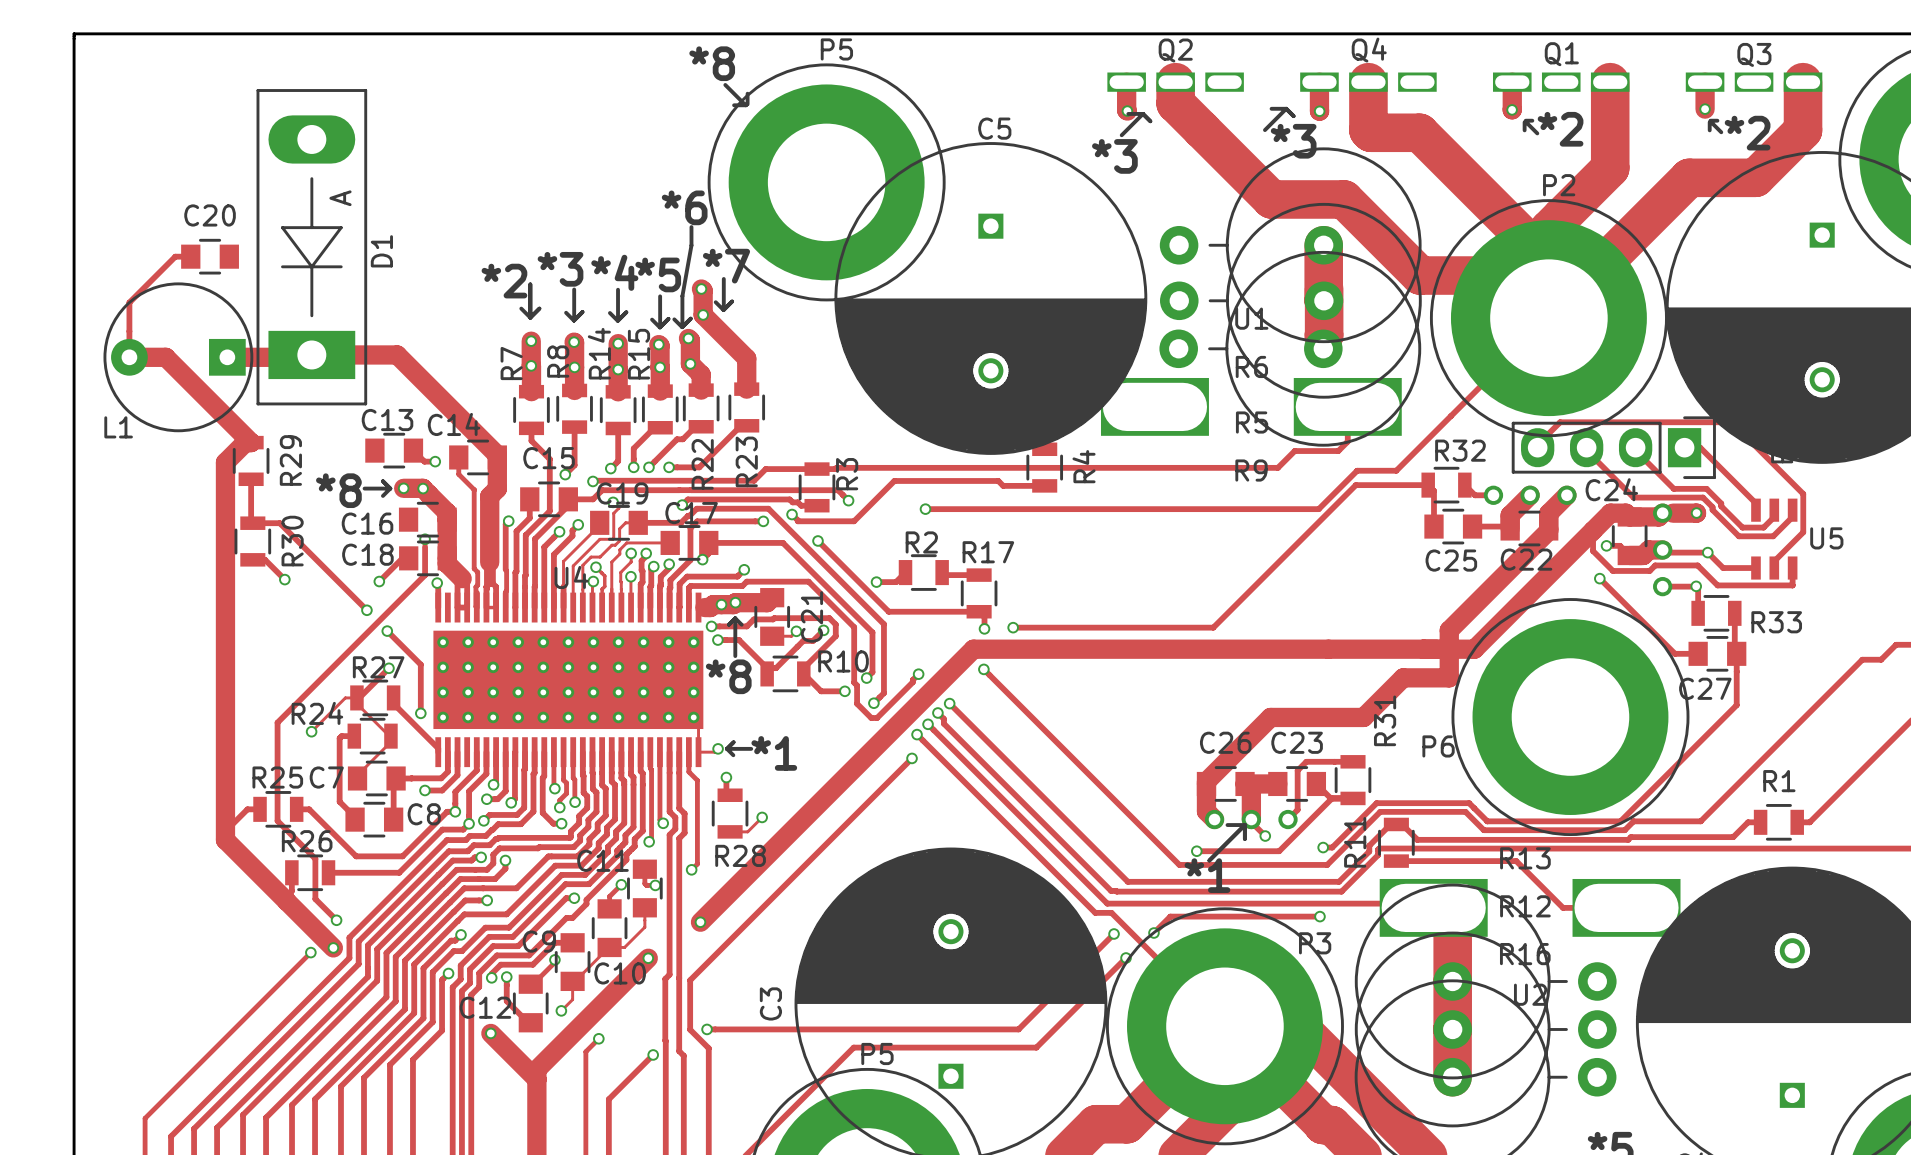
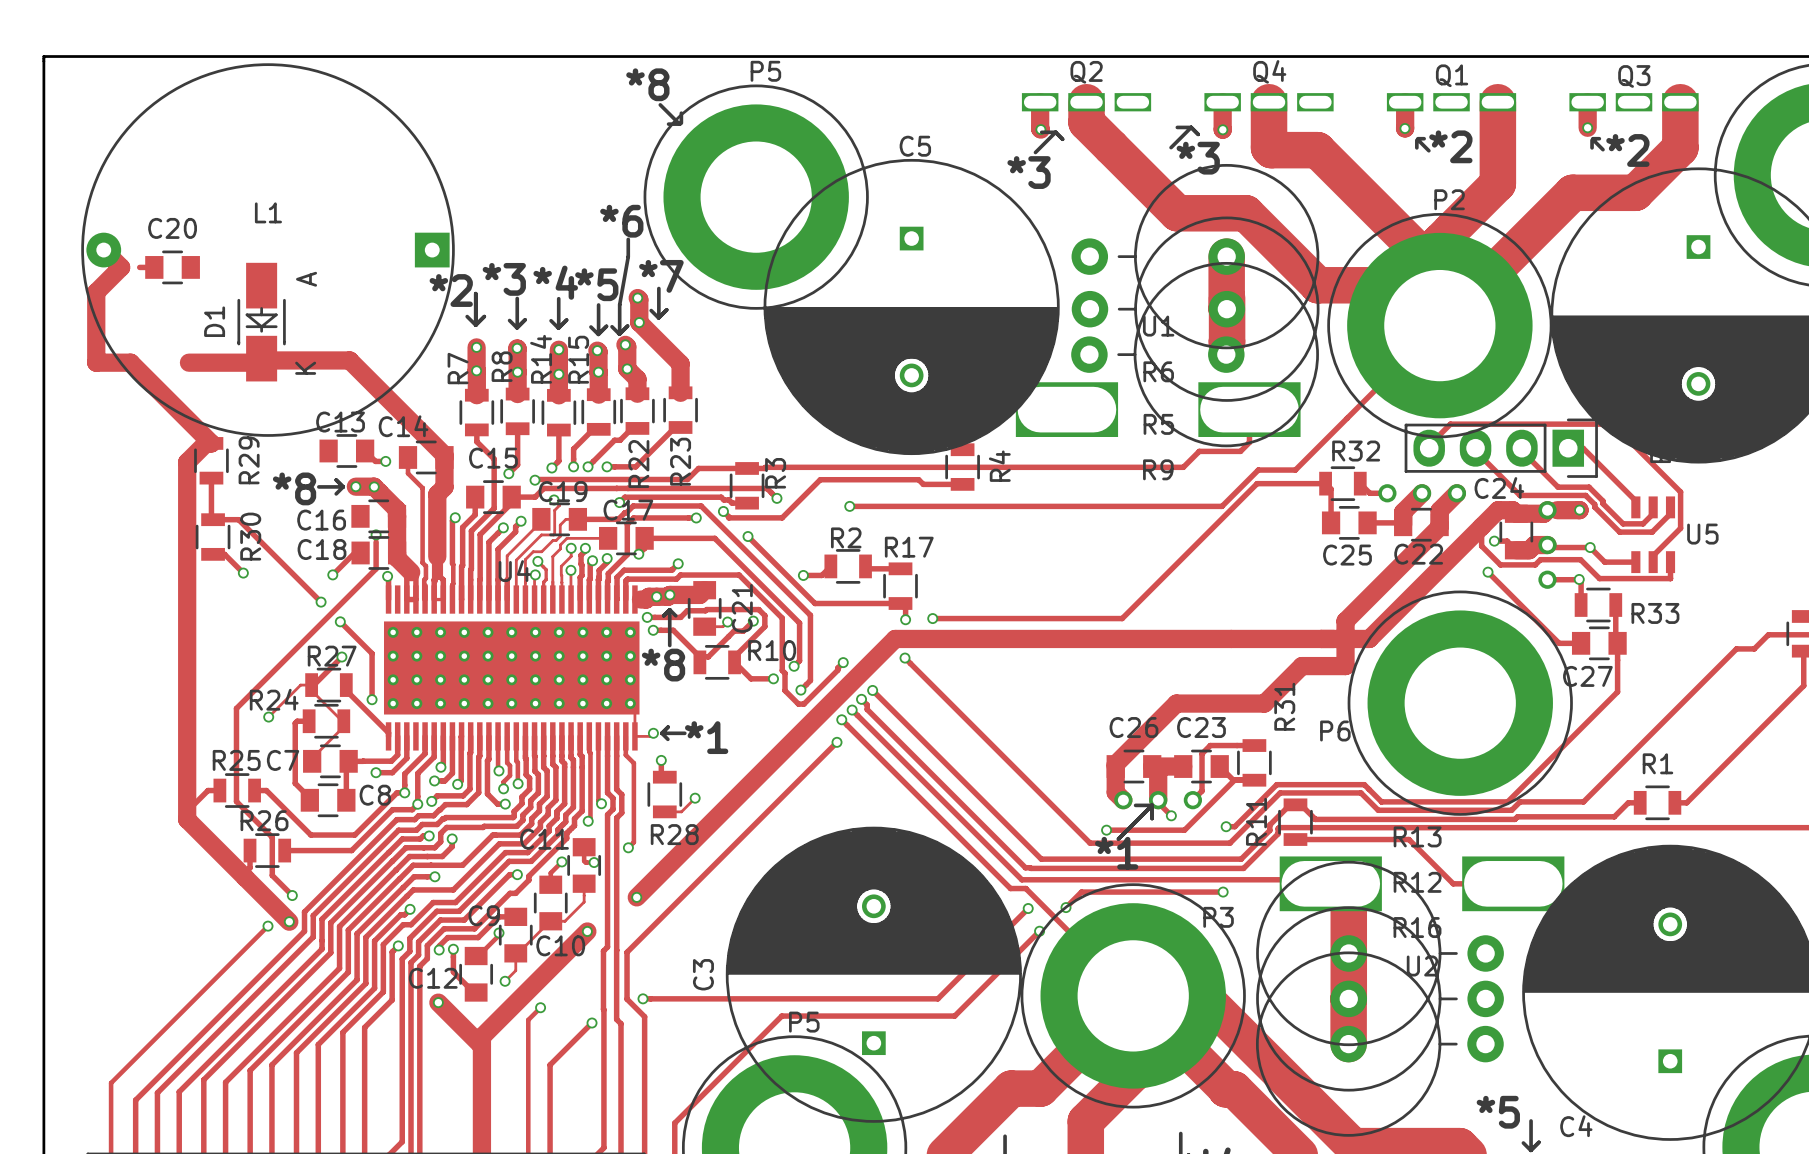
D1 footprint: [256, 89, 368, 406] -> [237, 262, 286, 382]
D1 name position: D1 (381, 251) -> D1 (214, 321)
track: (175, 256) (129, 302) -> (103, 250) (121, 267) (96, 292) (96, 310)
L1 footprint: [103, 282, 254, 433] -> [81, 63, 455, 437]
track width: thin (129, 302) (129, 357) -> thick (96, 310) (96, 362)
L1 name position: L1 (118, 427) -> L1 (268, 212)

